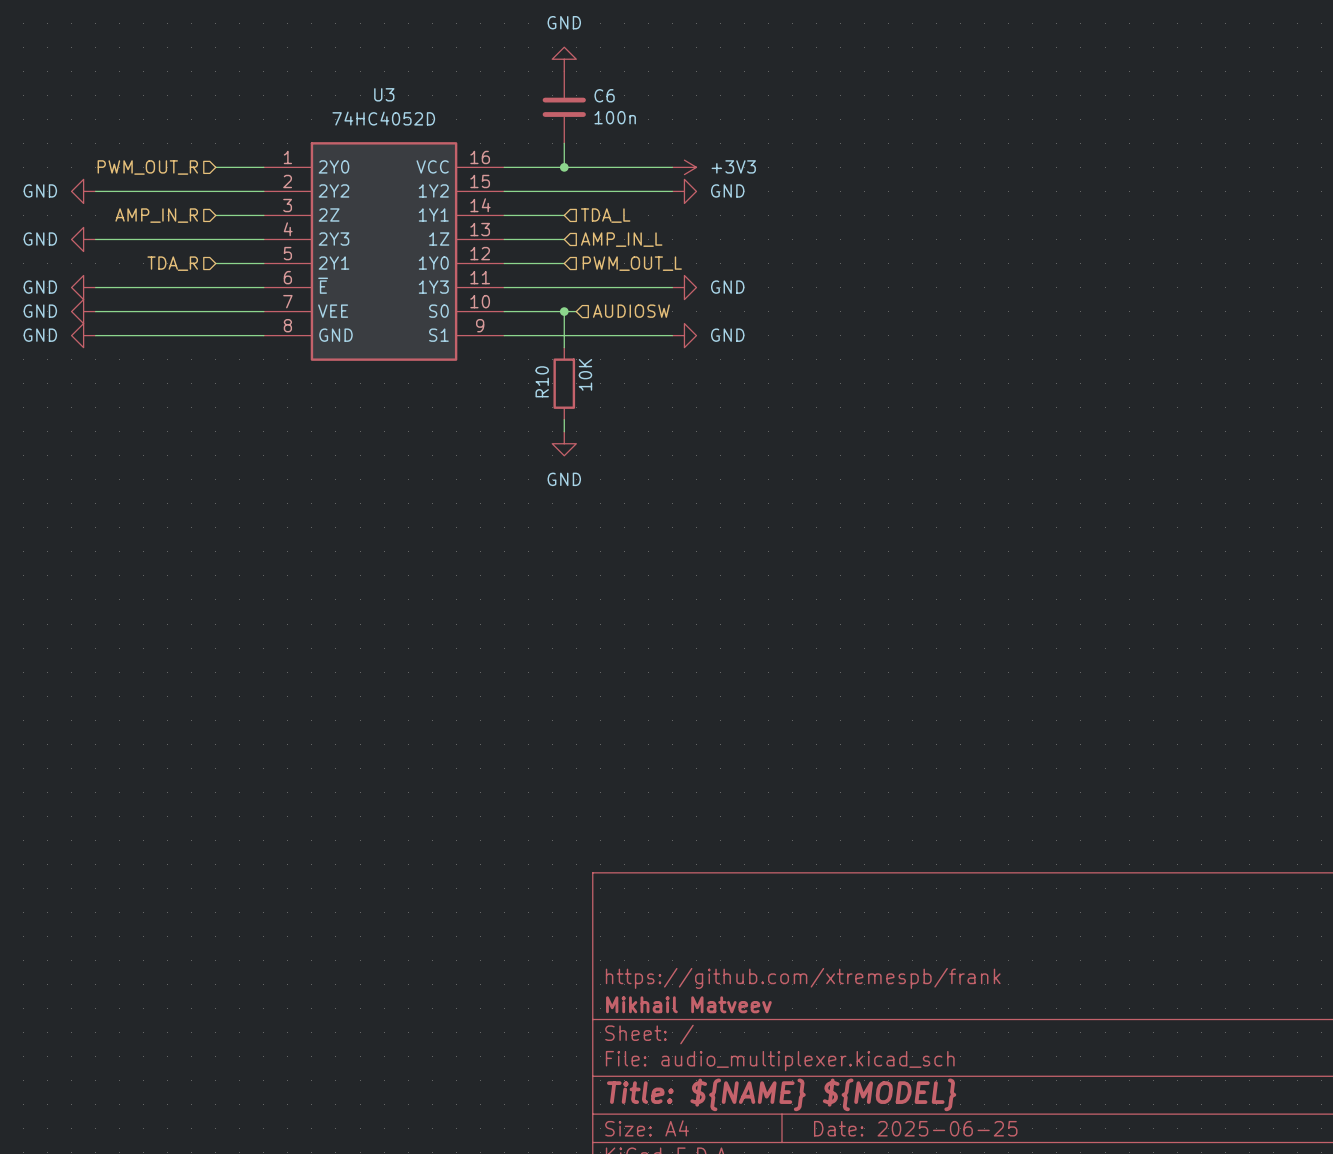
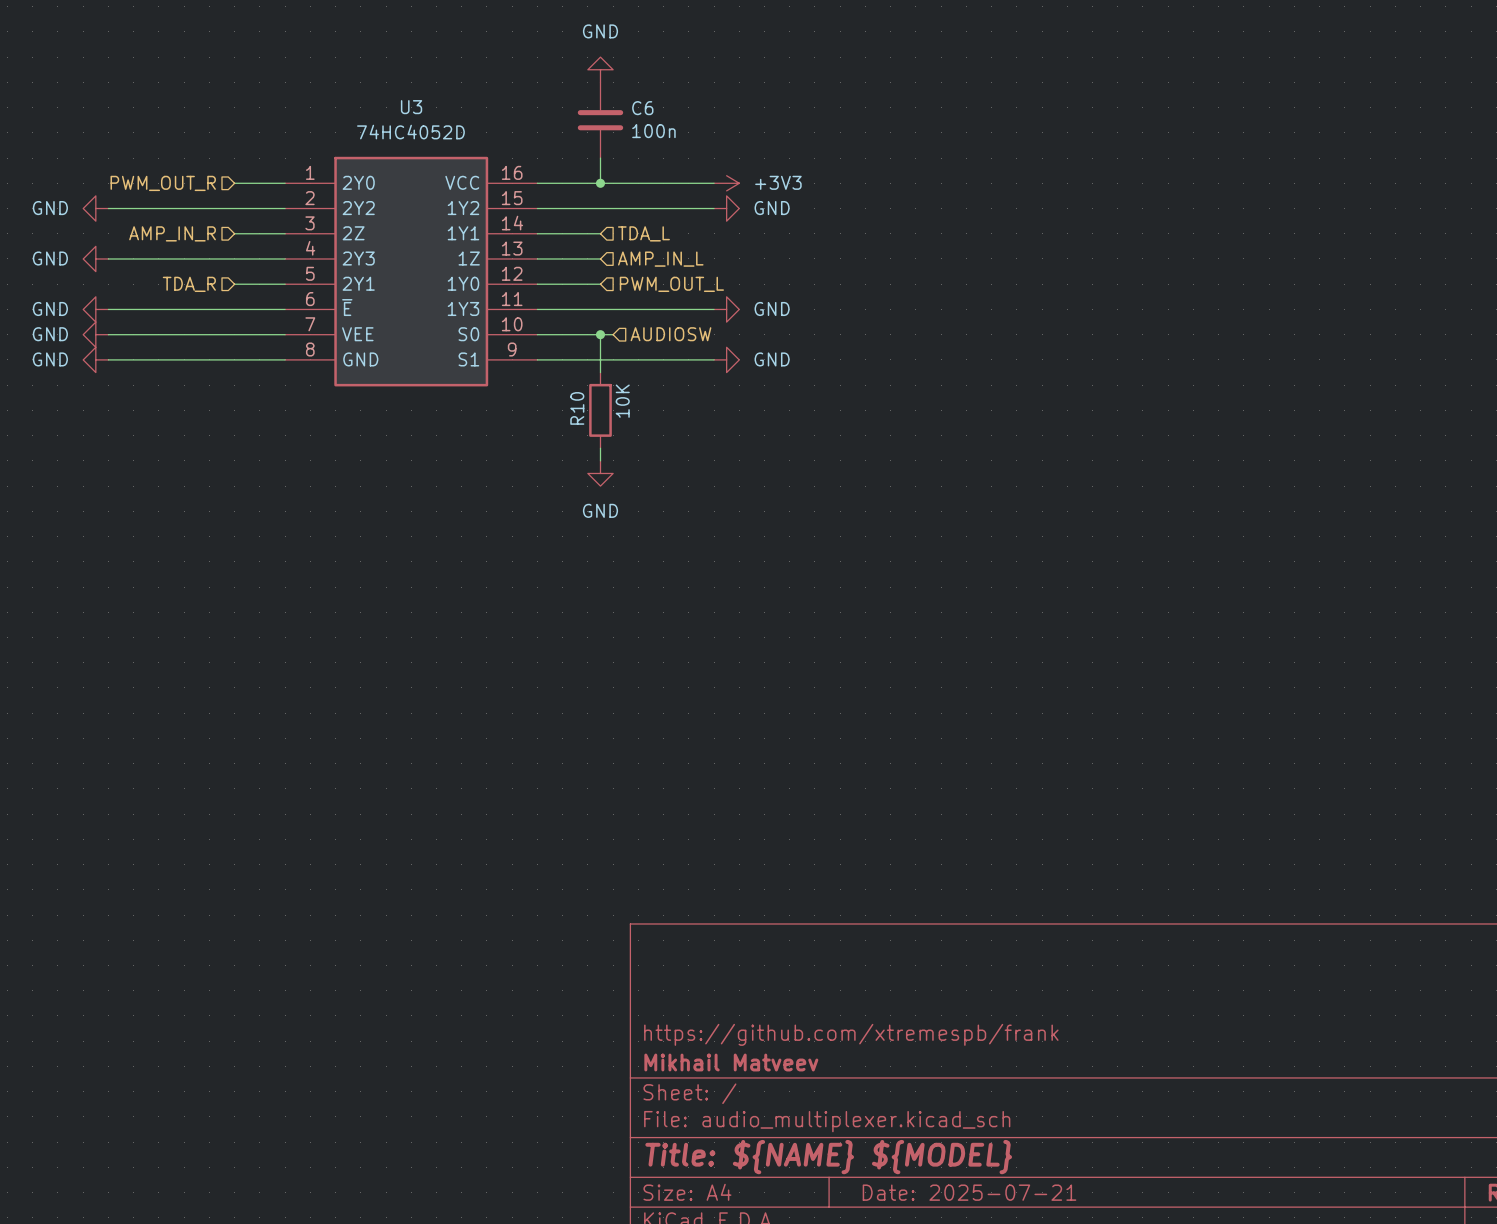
title block: Date: 2025-06-25 (915, 1128) -> Date: 2025-07-21 (969, 1192)

